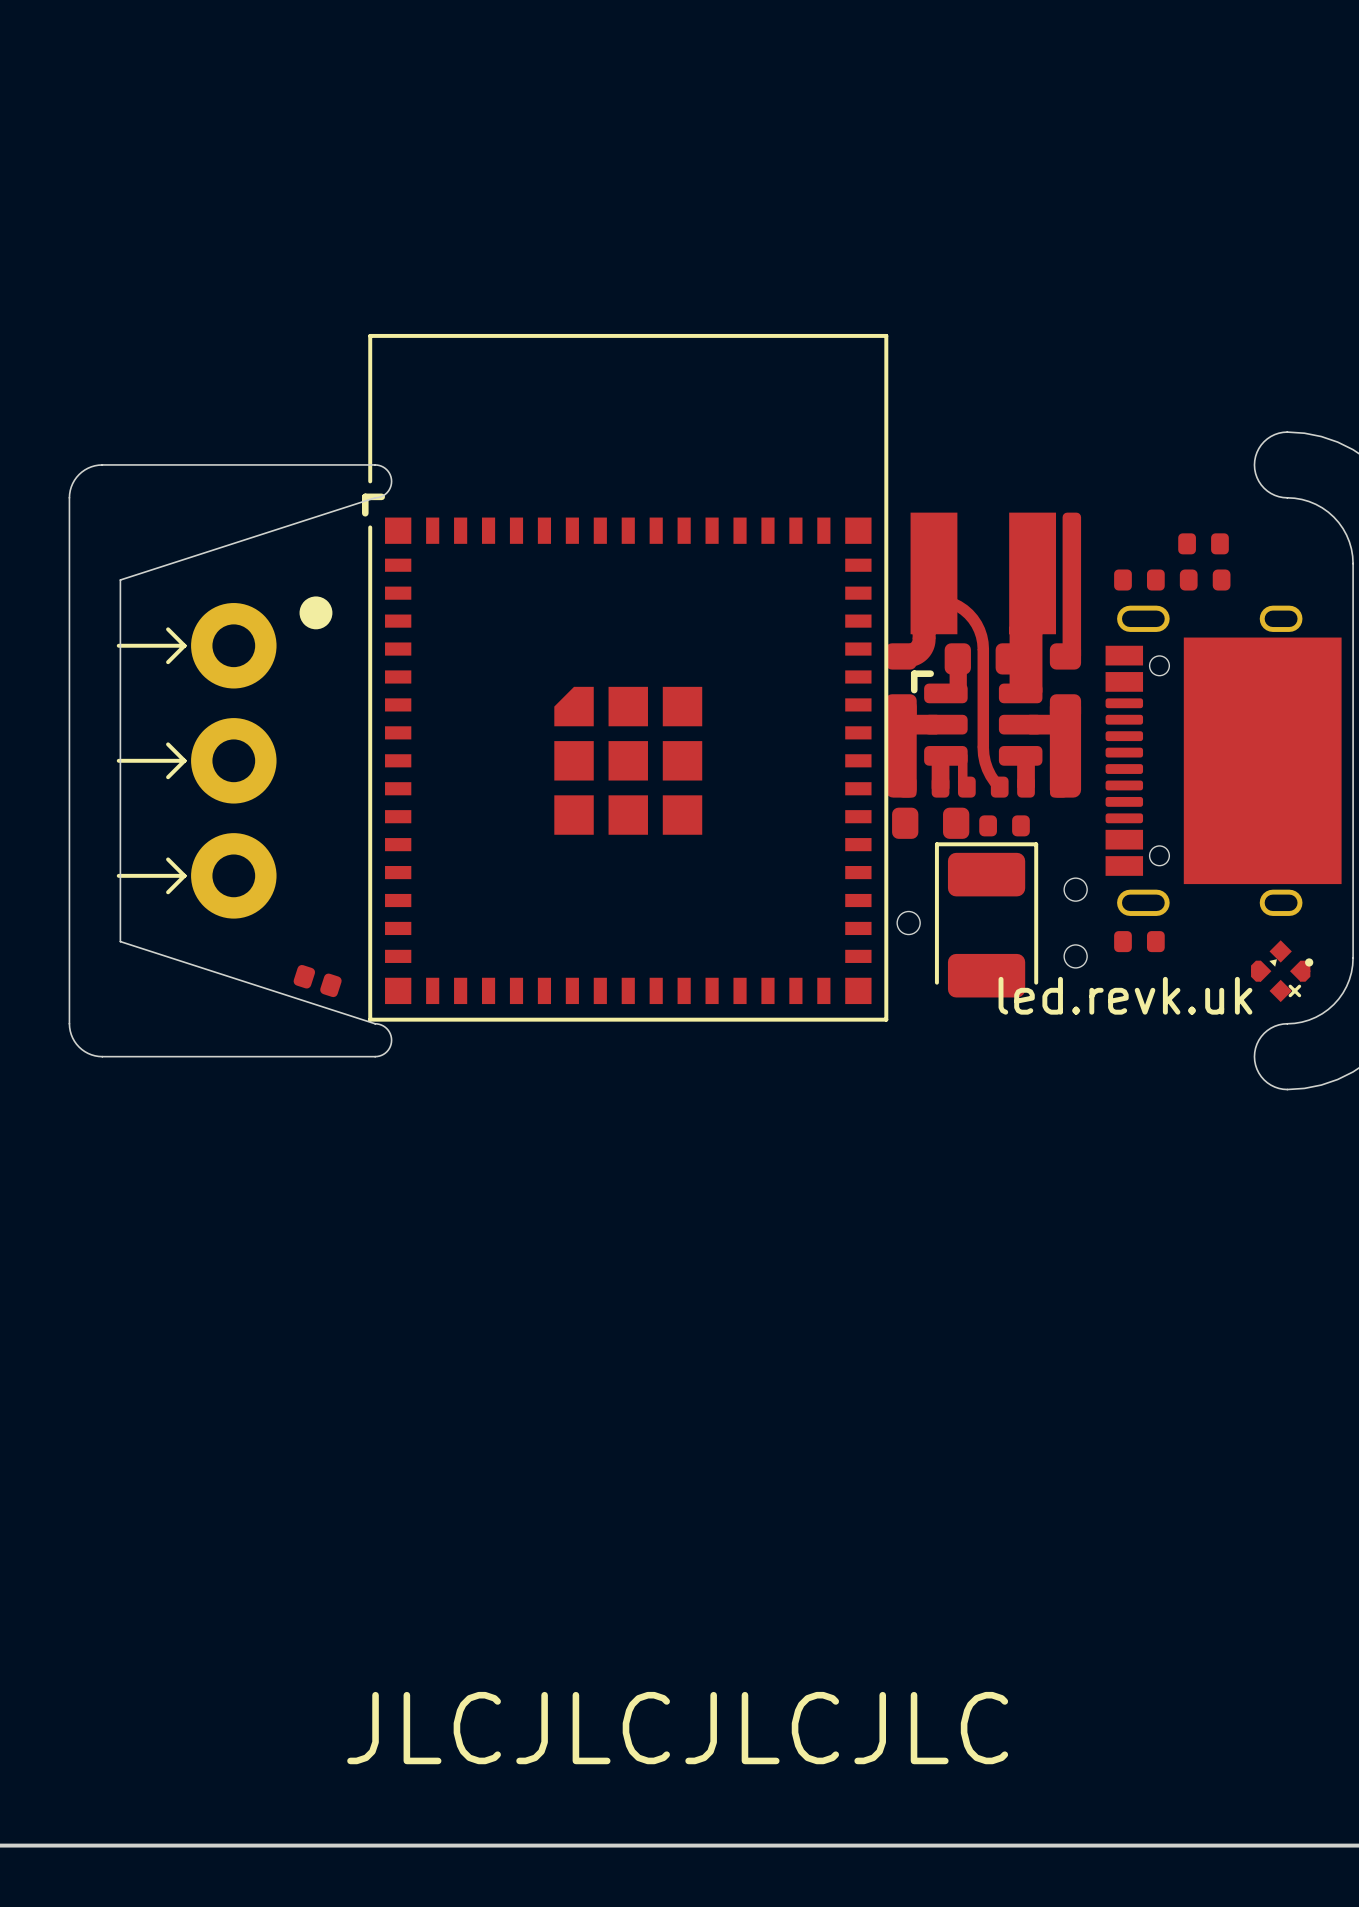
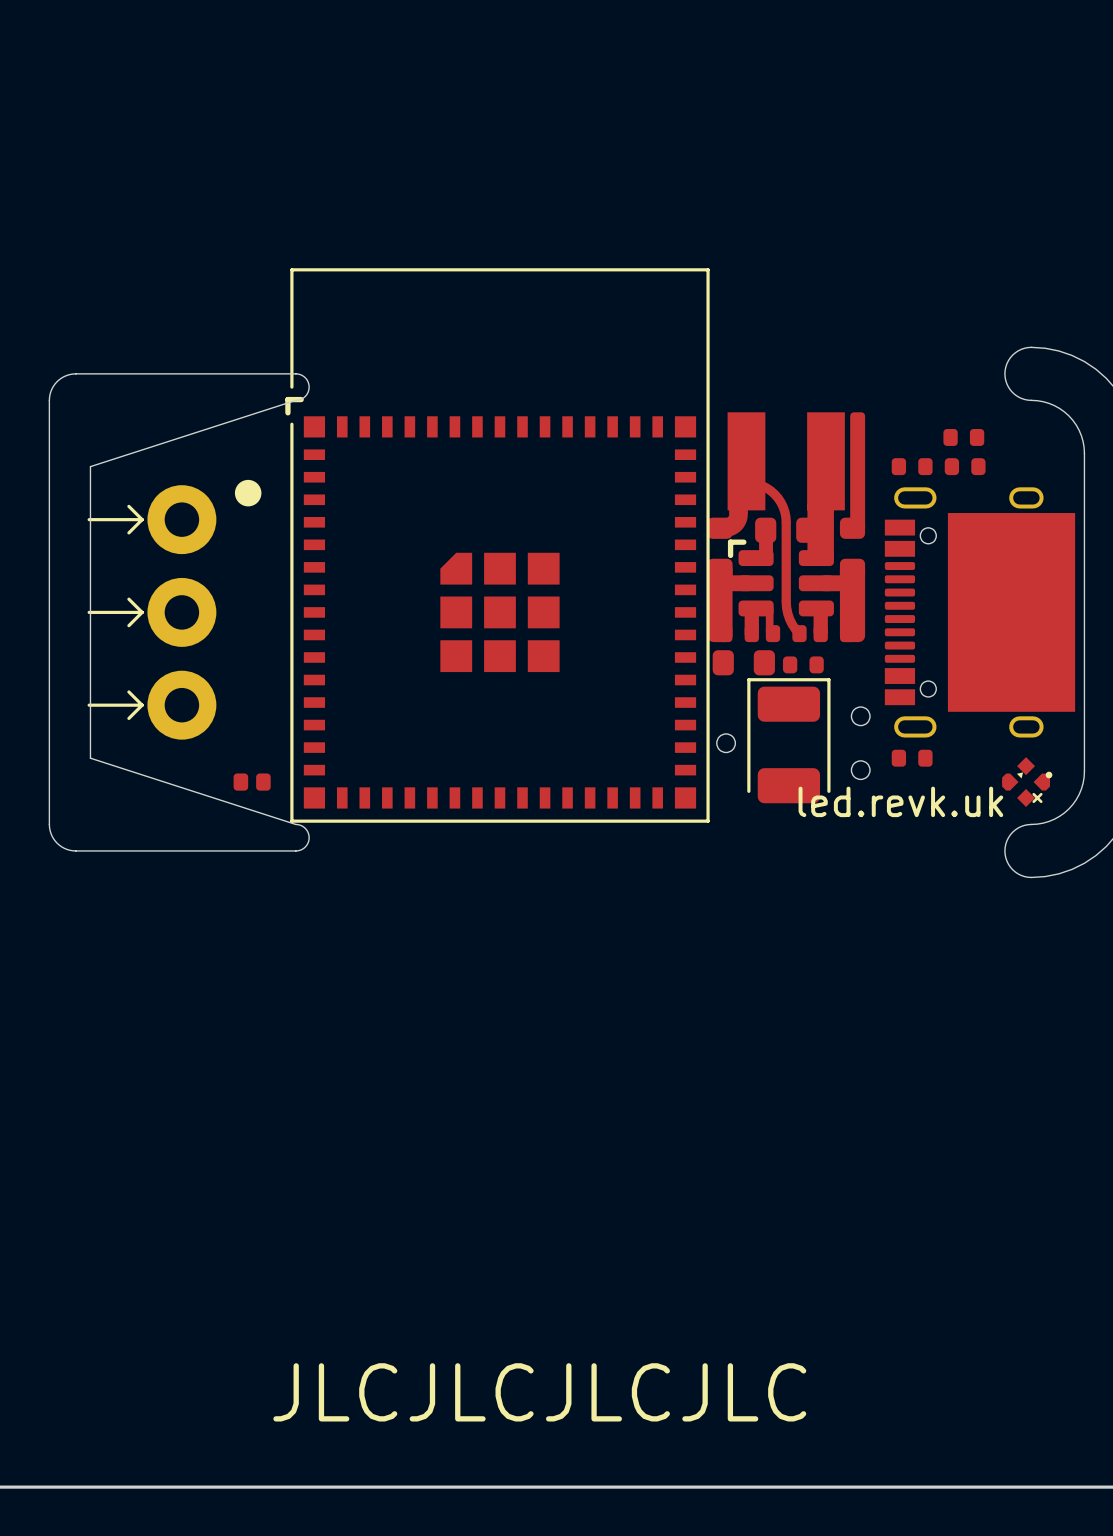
part rotation: 0° (317, 981) -> 17.9° counterclockwise (252, 782)

